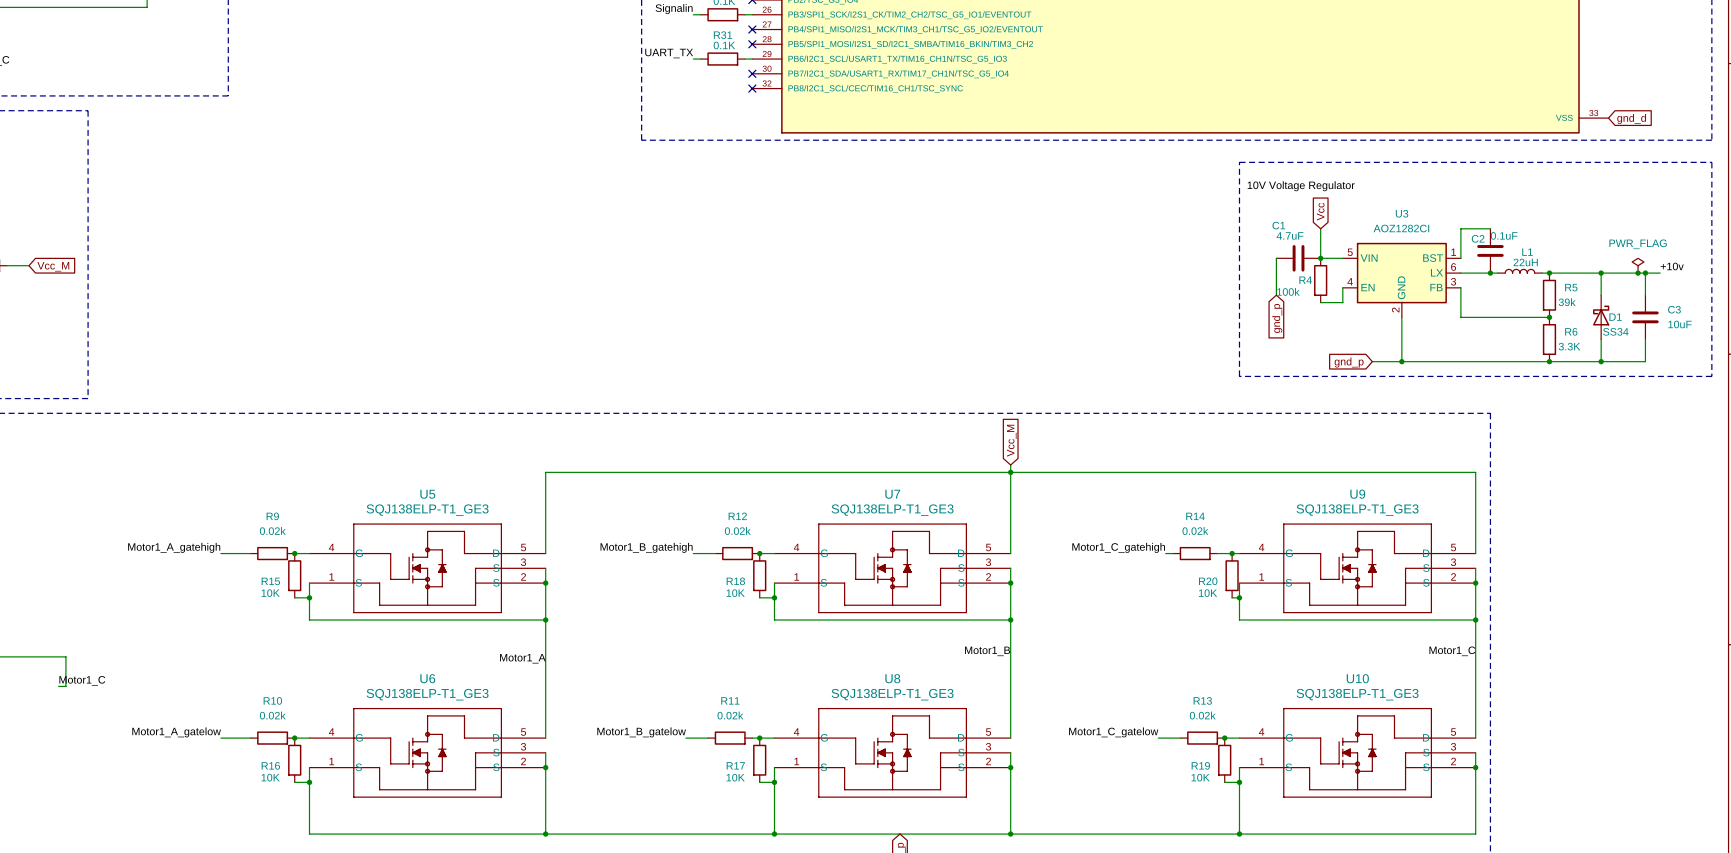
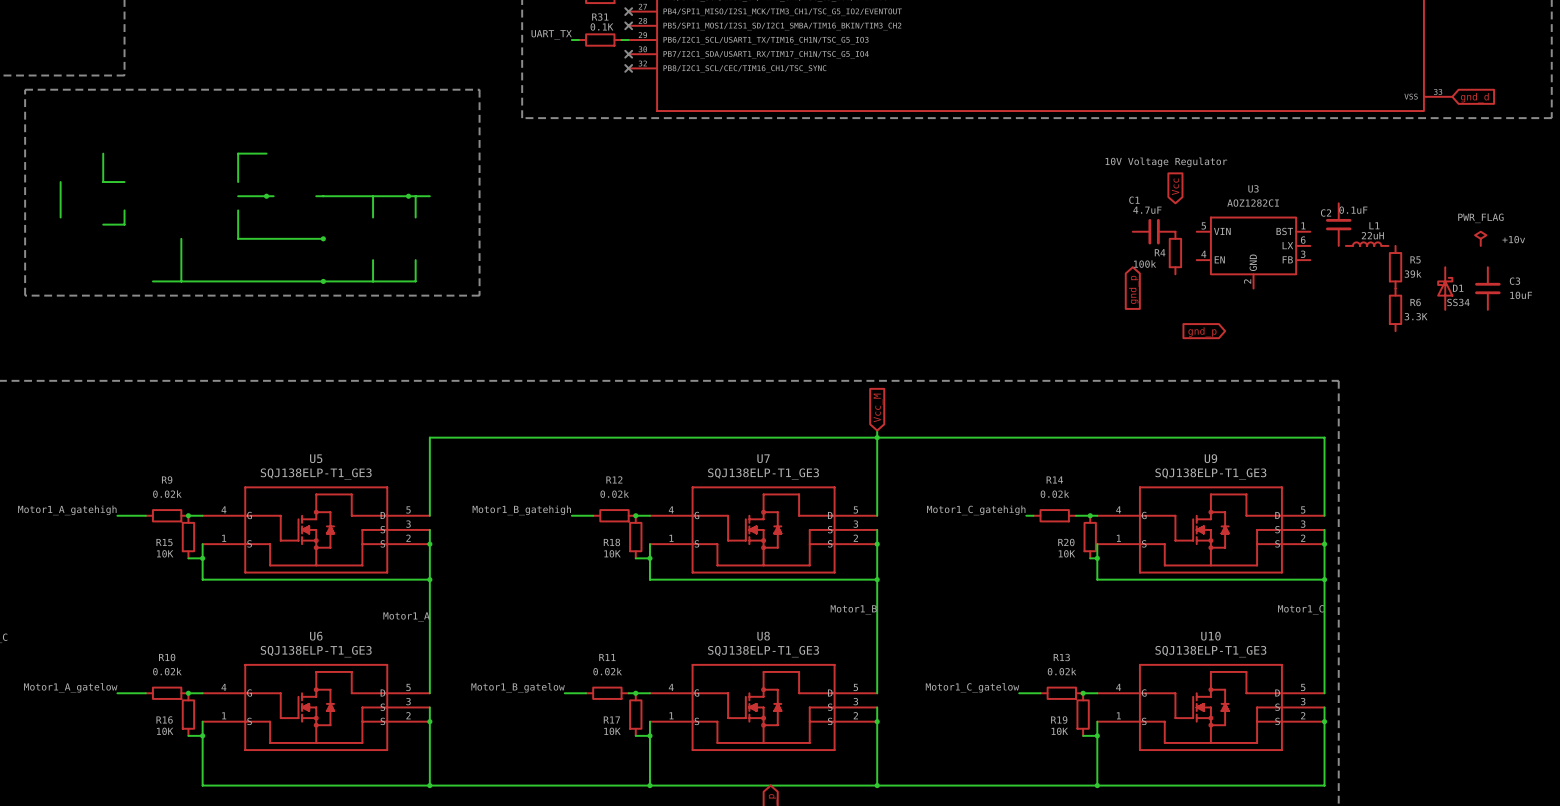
line: none -> (25, 89) (479, 89) (479, 295) (25, 295) (25, 89)
line: (1239, 162) (1711, 162) (1711, 376) (1239, 376) (1239, 162) -> none
wire: none -> (103, 153) (103, 182) (124, 182)
wire: none -> (266, 153) (238, 153) (238, 182)
wire: none -> (60, 182) (60, 217)
wire: none -> (238, 196) (273, 196)
junction: none -> (266, 196)
wire: none -> (316, 196) (429, 196)
wire: none -> (373, 196) (373, 217)
junction: none -> (408, 196)
wire: none -> (415, 196) (415, 217)
wire: (1320, 228) (1320, 258) (1342, 258) -> none
wire: (1490, 228) (1460, 228) (1460, 258) -> none
wire: none -> (124, 210) (124, 224) (103, 224)
wire: none -> (238, 210) (238, 238) (323, 238)
wire: (1276, 258) (1276, 295) -> none
junction: (1320, 258) -> none
wire: none -> (181, 238) (181, 281)
junction: none -> (323, 238)
wire: (1460, 273) (1497, 273) -> none
junction: (1490, 273) -> none
wire: (1542, 273) (1660, 273) -> none
junction: (1549, 273) -> none
wire: (1601, 273) (1601, 295) -> none
junction: (1601, 273) -> none
junction: (1638, 273) -> none
wire: (1645, 273) (1645, 295) -> none
junction: (1645, 273) -> none
wire: none -> (373, 260) (373, 281)
wire: none -> (415, 260) (415, 281) (152, 281)
wire: (1342, 287) (1342, 302) (1320, 302) -> none
wire: (1460, 287) (1460, 317) (1549, 317) -> none
junction: none -> (323, 281)
wire: (1401, 317) (1401, 361) -> none
junction: (1549, 317) -> none
wire: (1601, 339) (1601, 361) -> none
wire: (1645, 339) (1645, 361) (1372, 361) -> none
junction: (1401, 361) -> none
junction: (1549, 361) -> none
junction: (1601, 361) -> none

